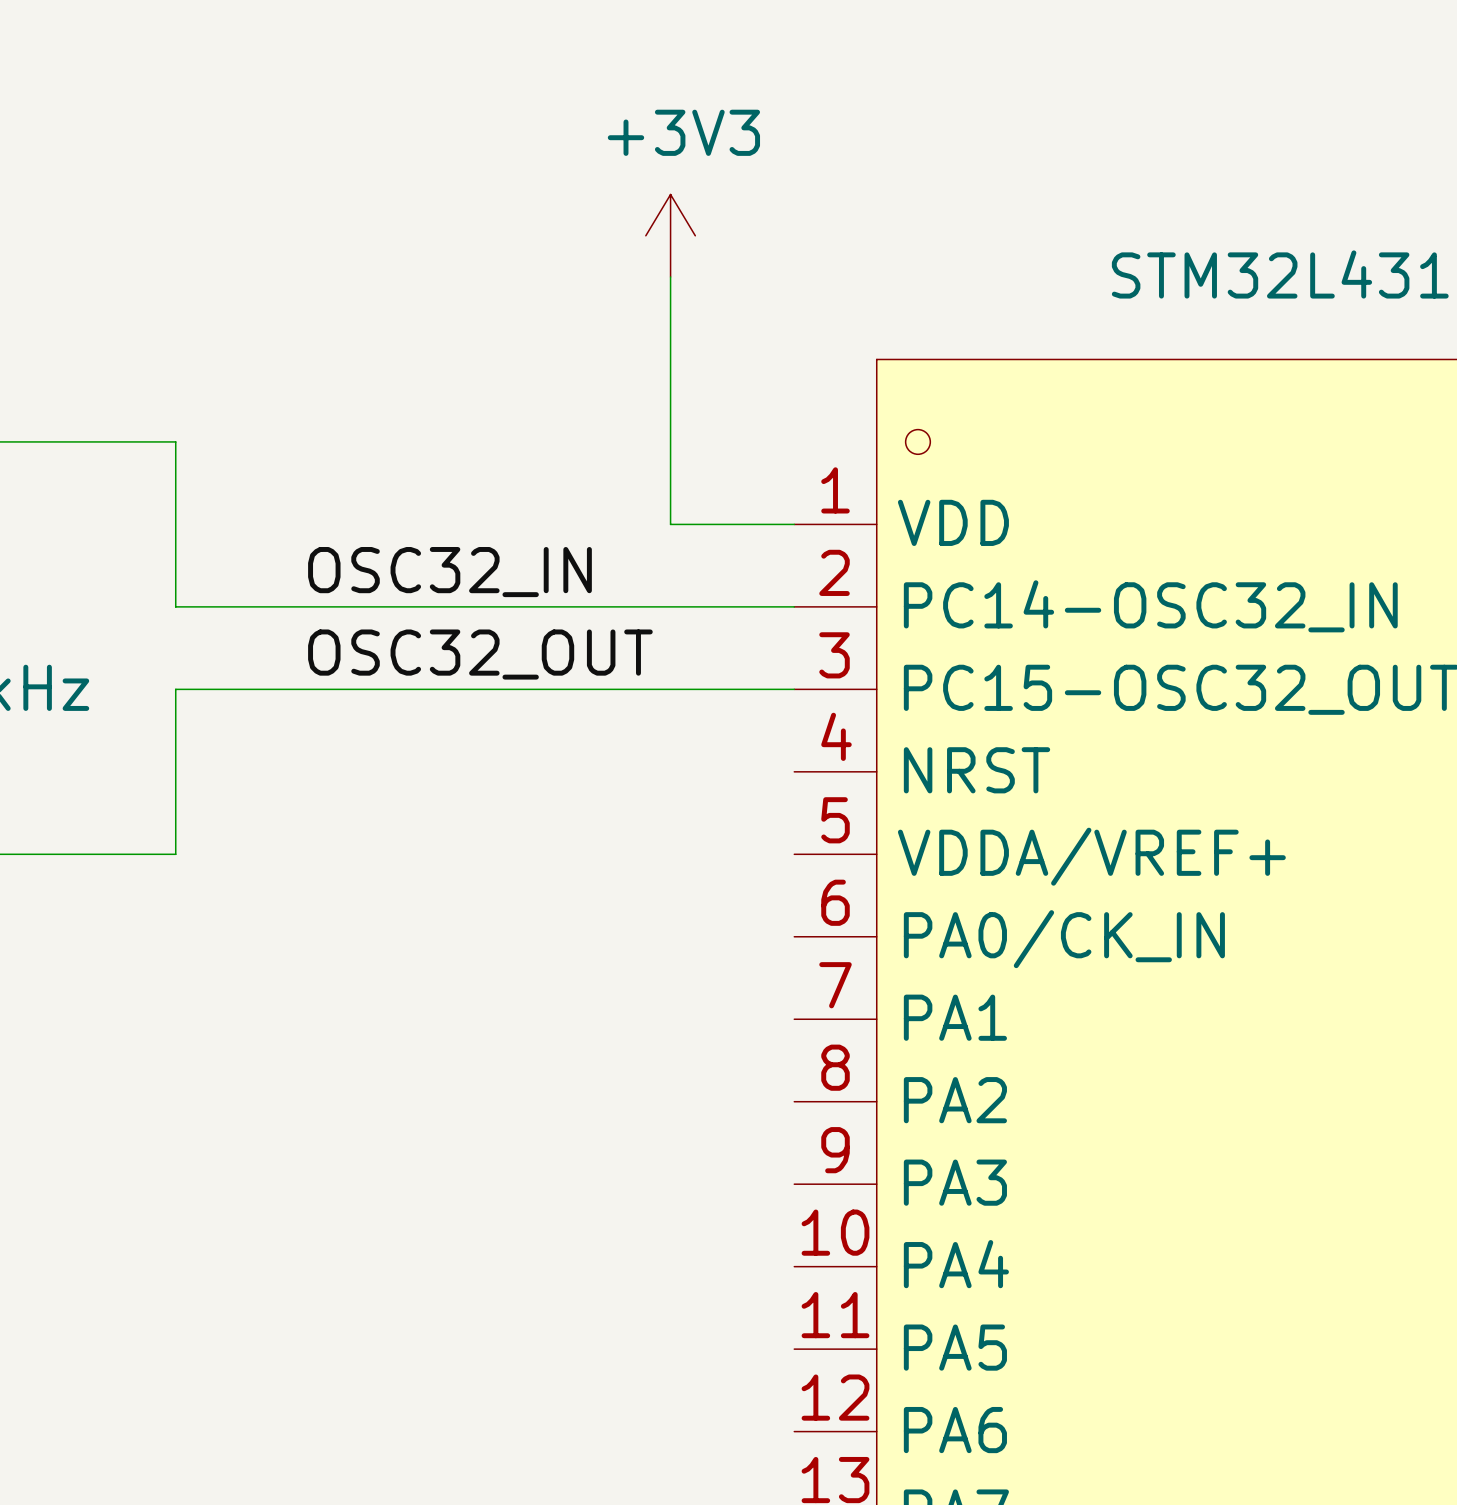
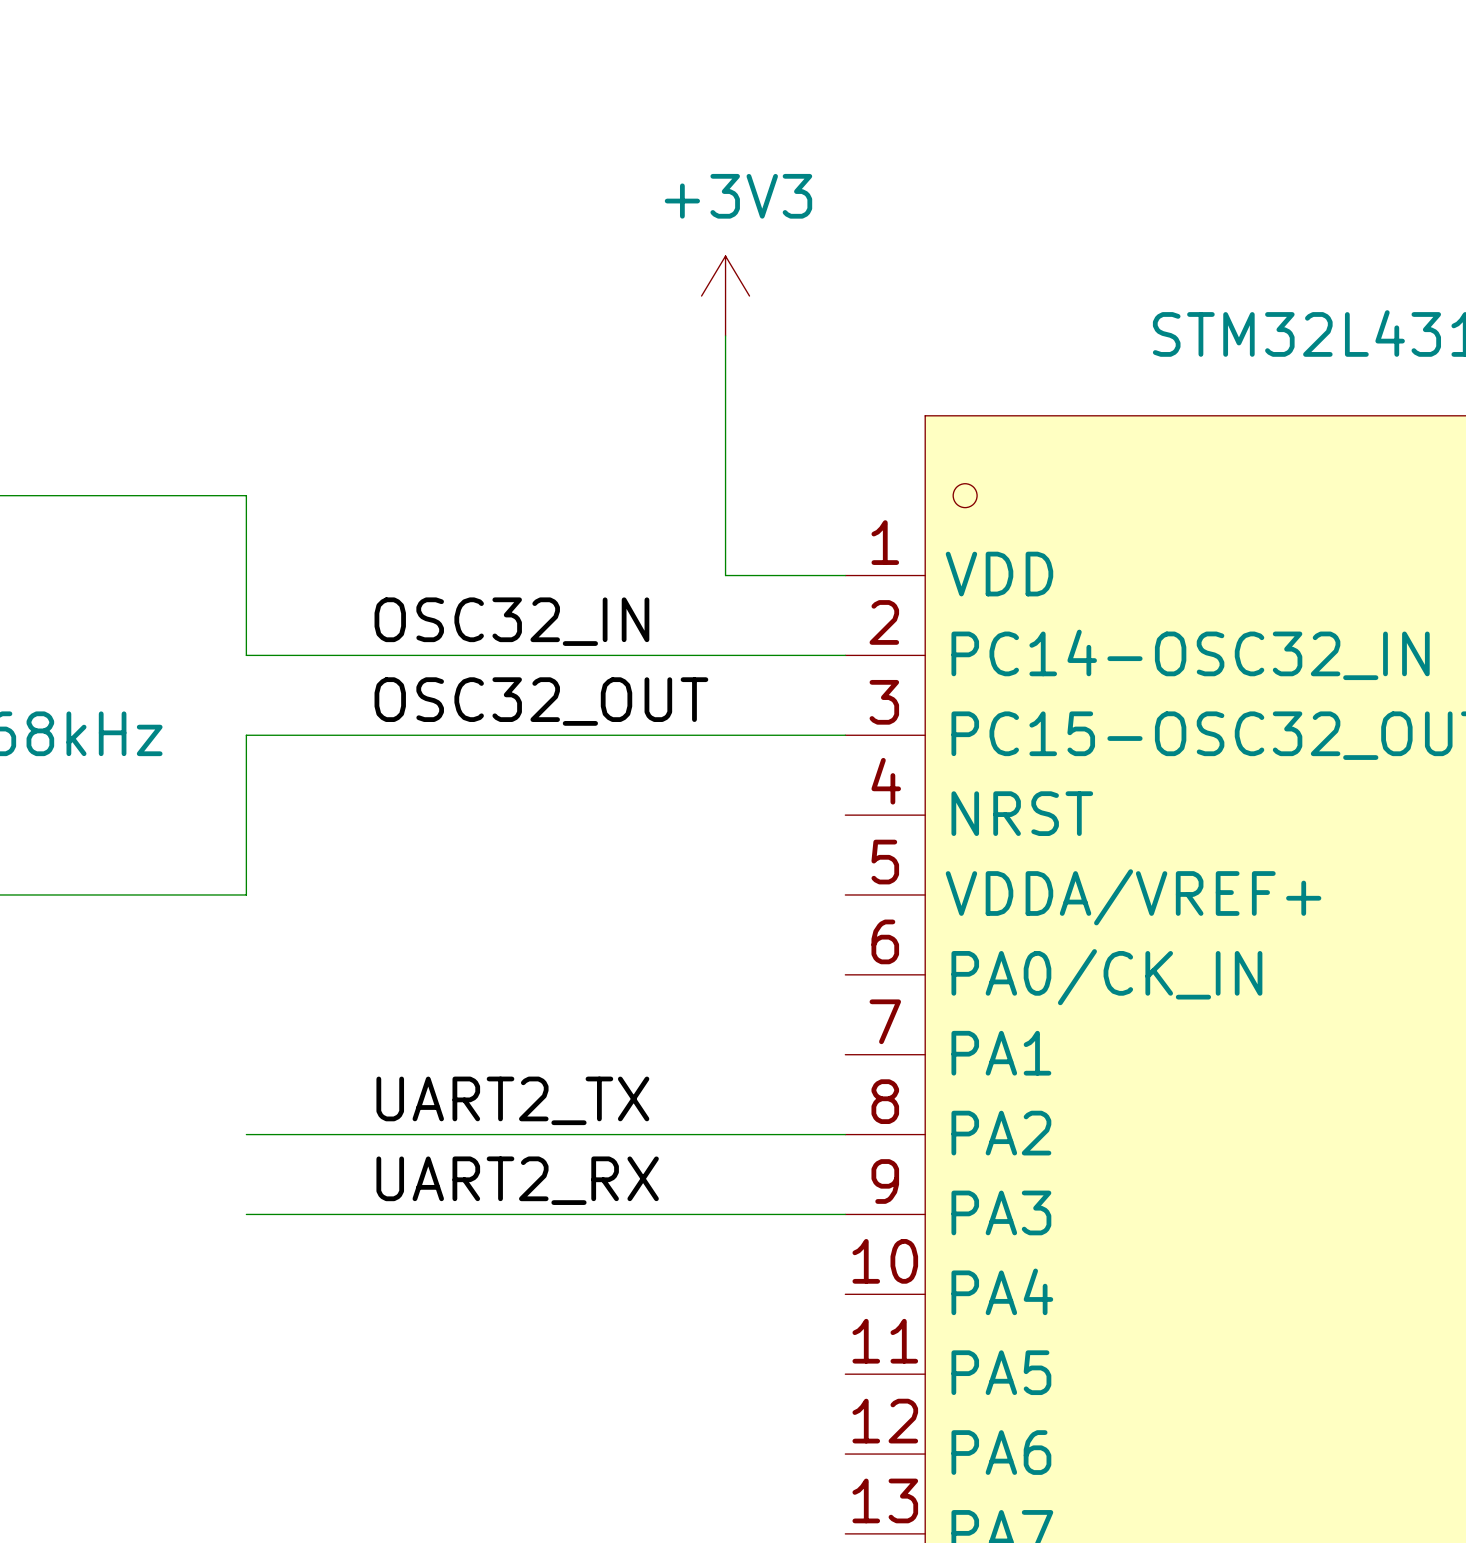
label: none -> UART2_TX (512, 1100)
wire: none -> (246, 1134) (845, 1134)
label: none -> UART2_RX (517, 1180)
wire: none -> (246, 1214) (845, 1214)

